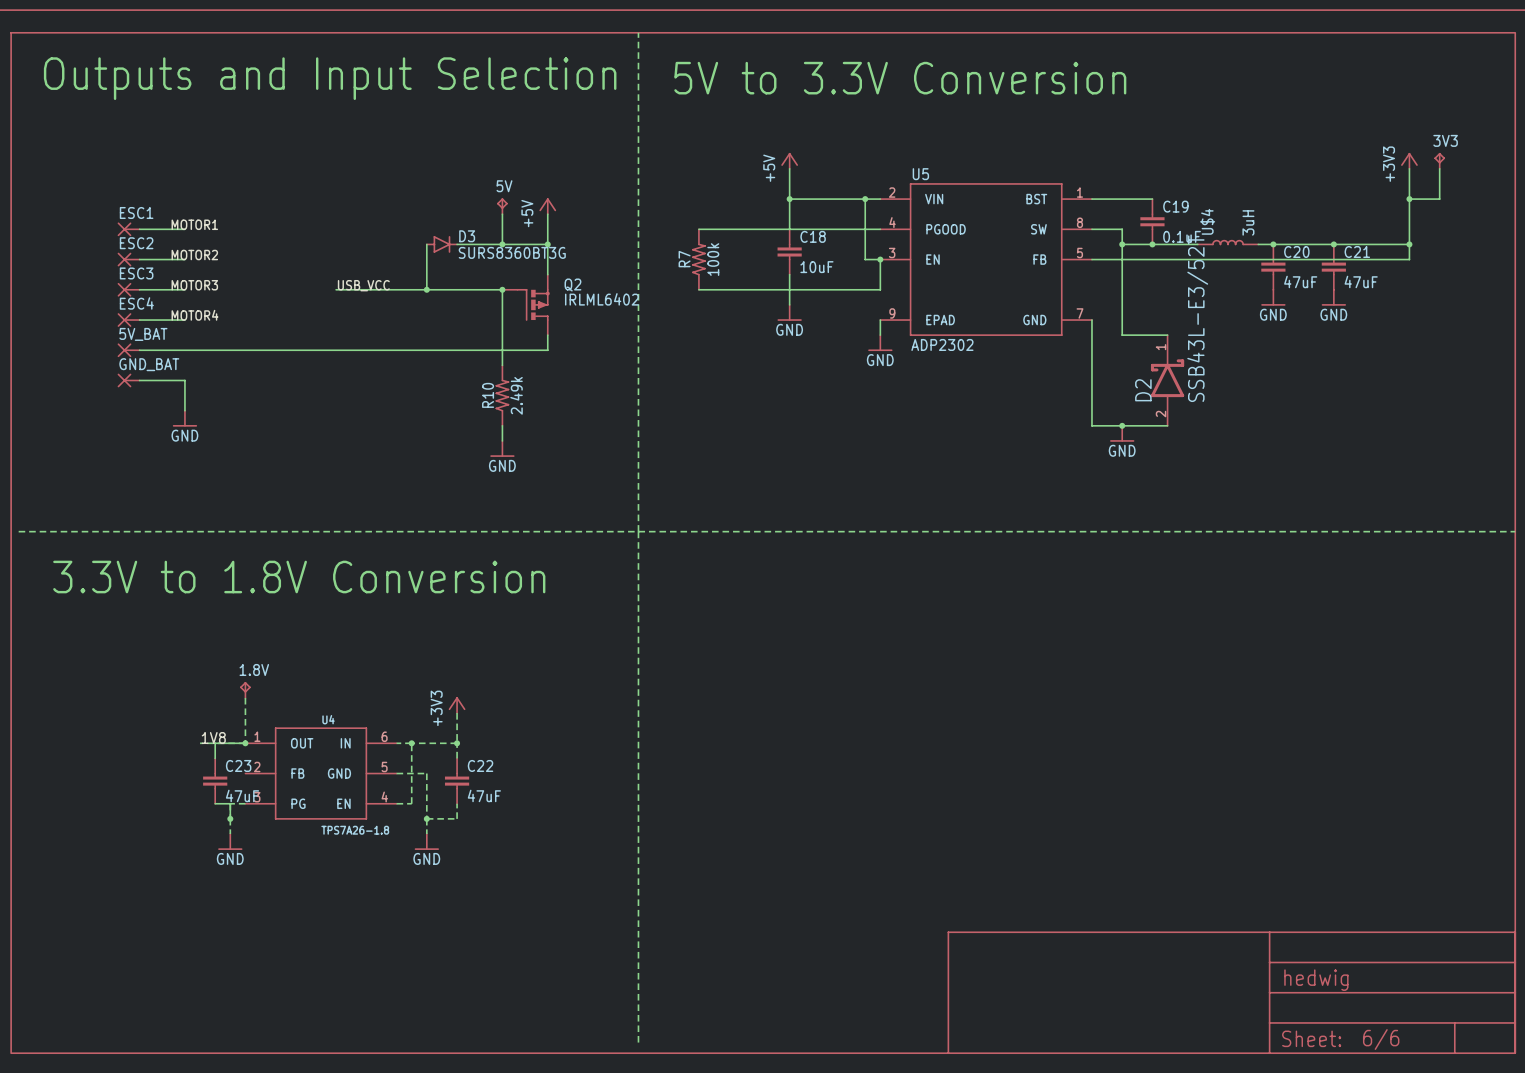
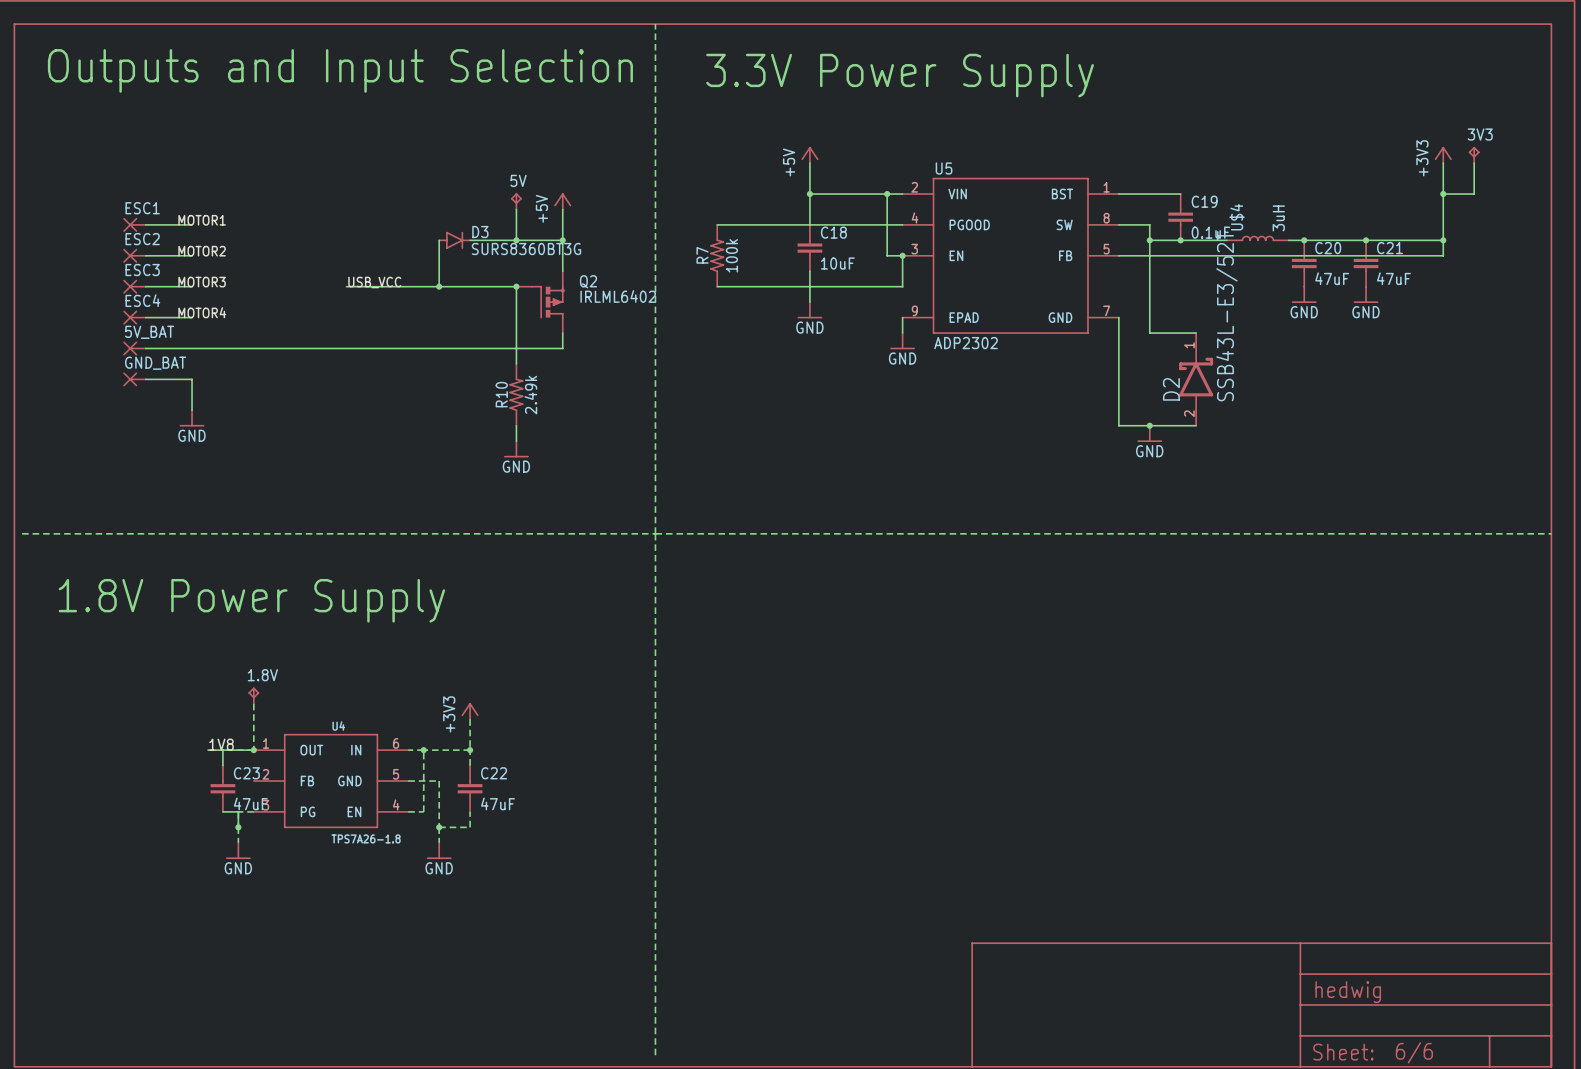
text: 5V to 3.3V Conversion (900, 78) -> none
text: none -> 3.3V Power Supply (900, 75)
text: 3.3V to 1.8V Conversion (299, 577) -> none
text: none -> 1.8V Power Supply (251, 600)

